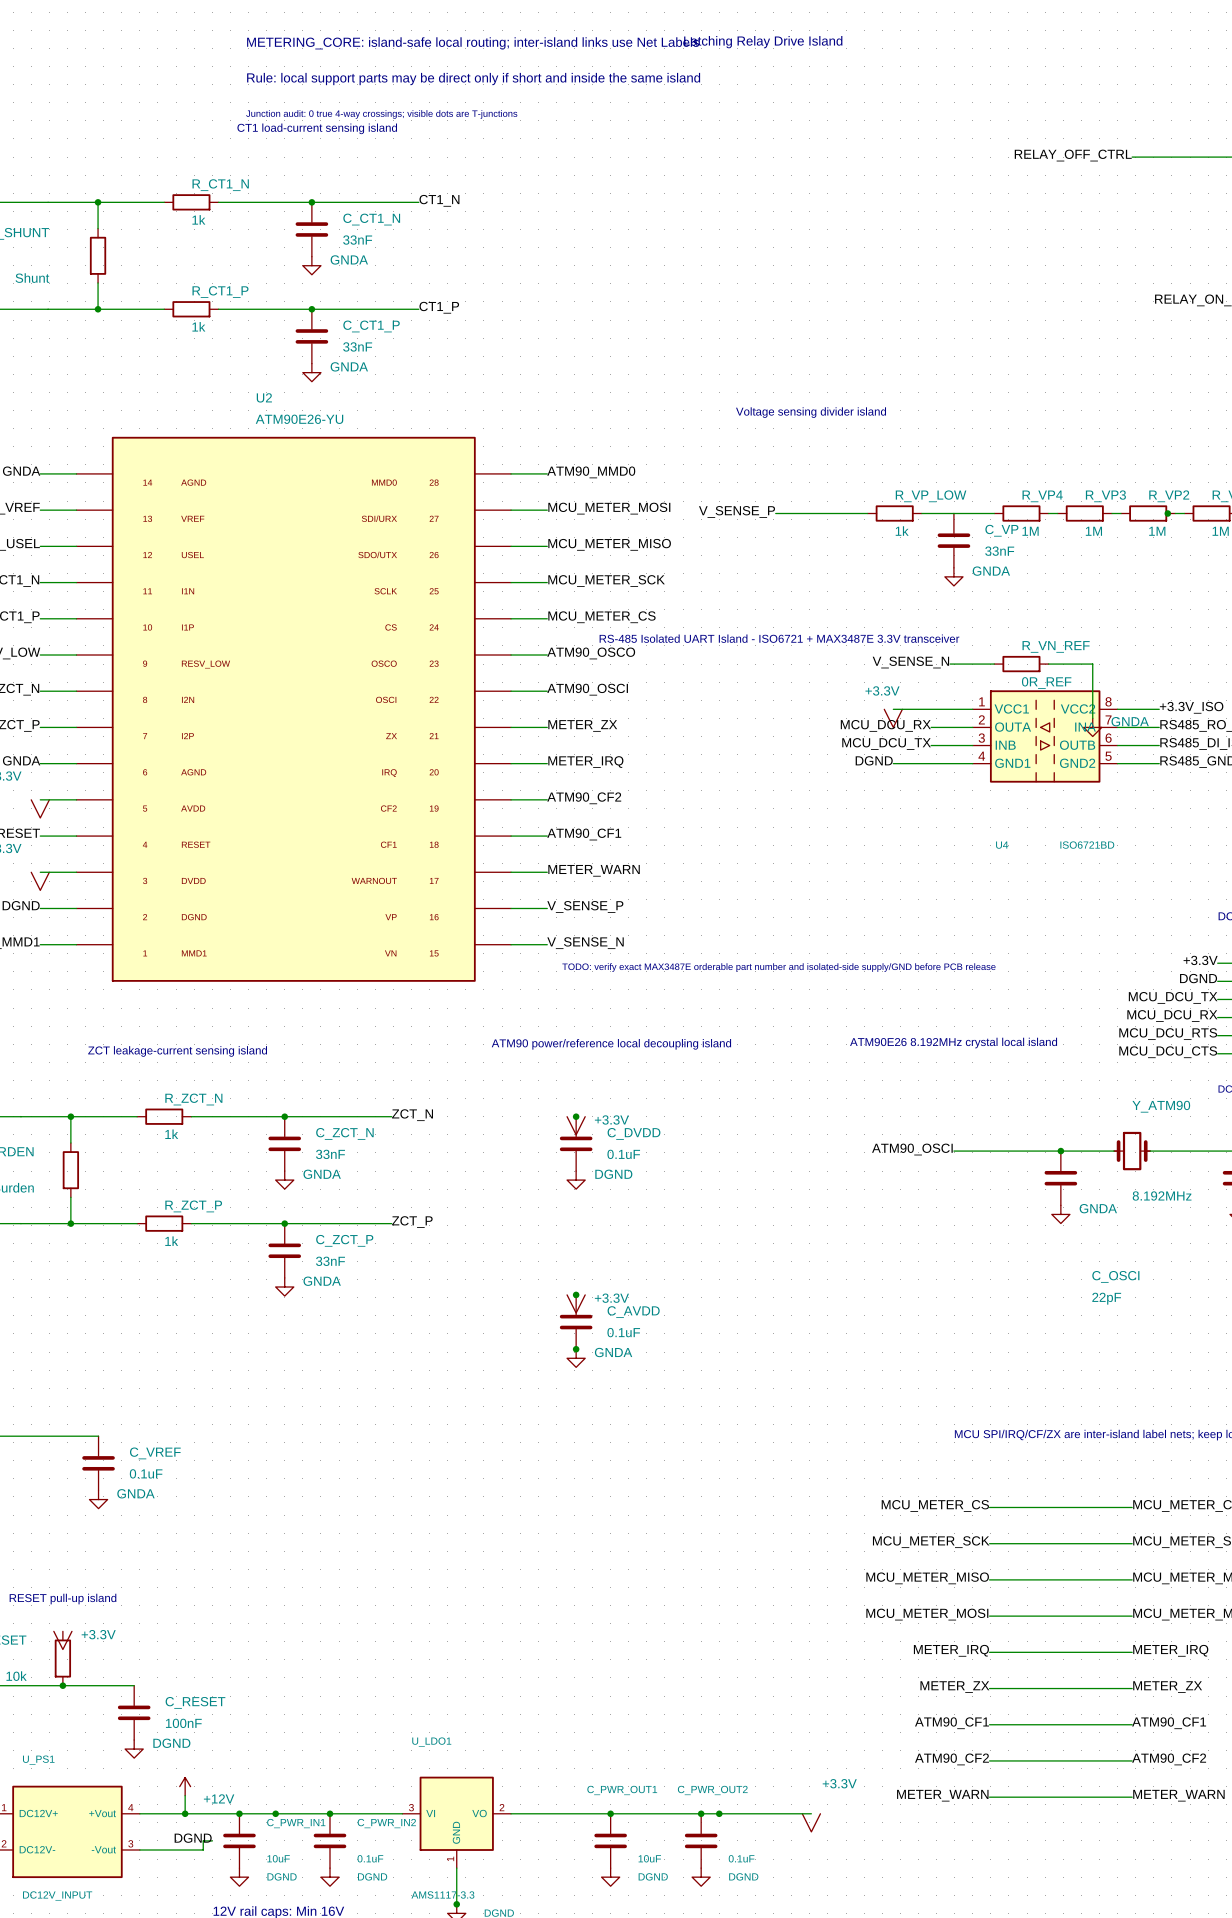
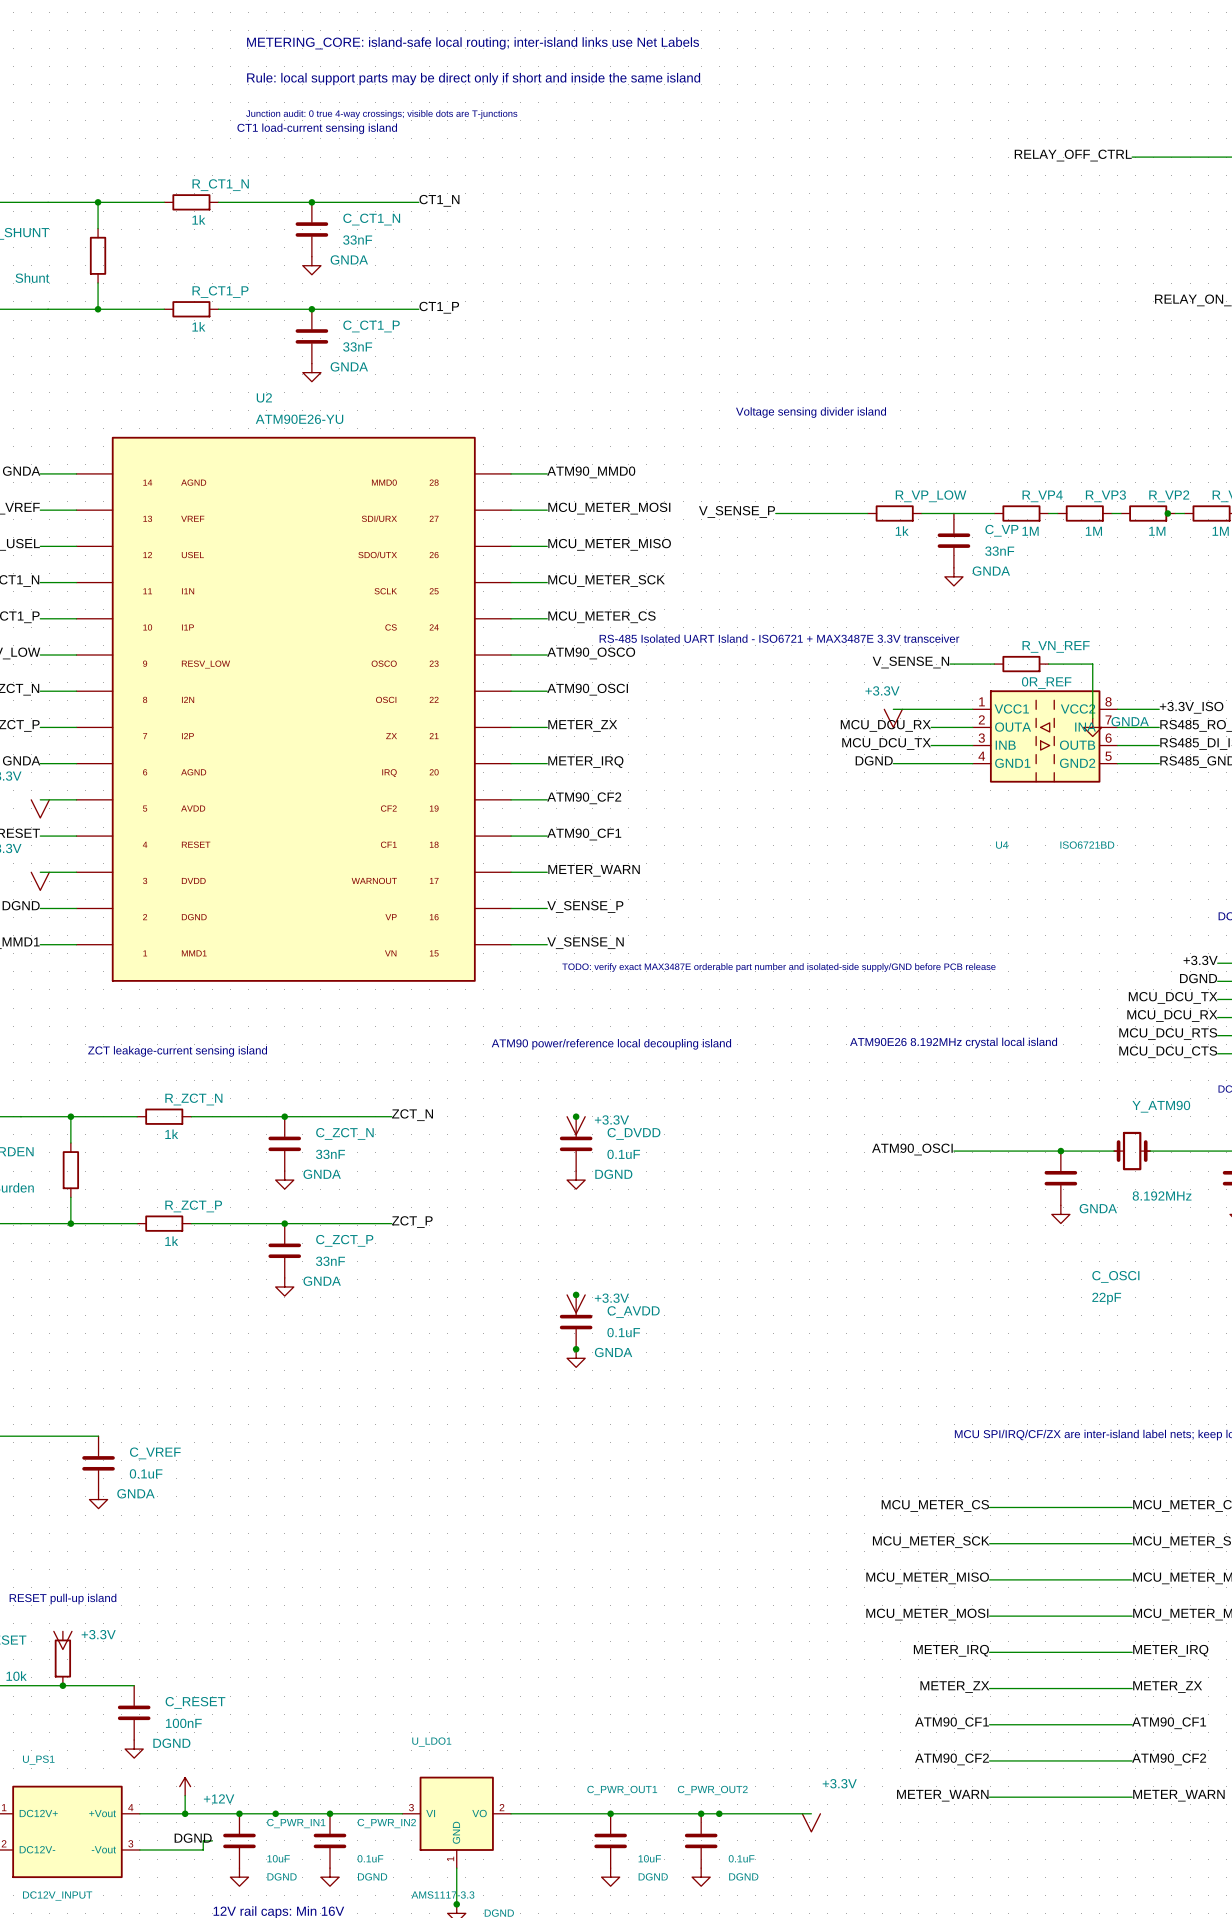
text: Latching Relay Drive Island (763, 42) -> none

